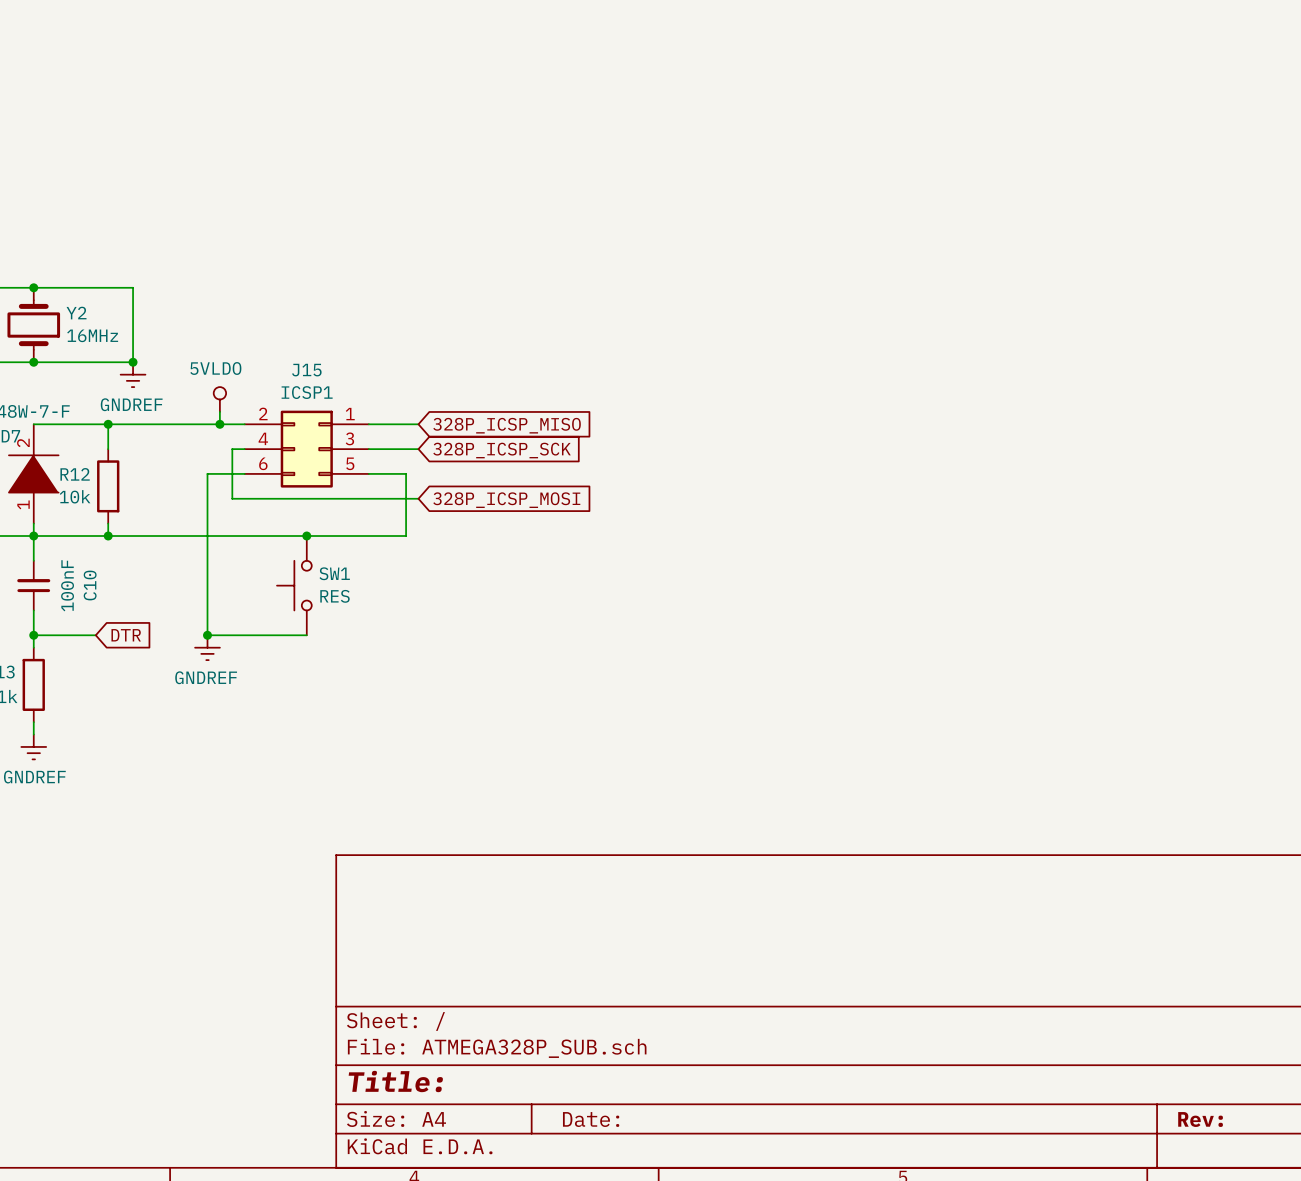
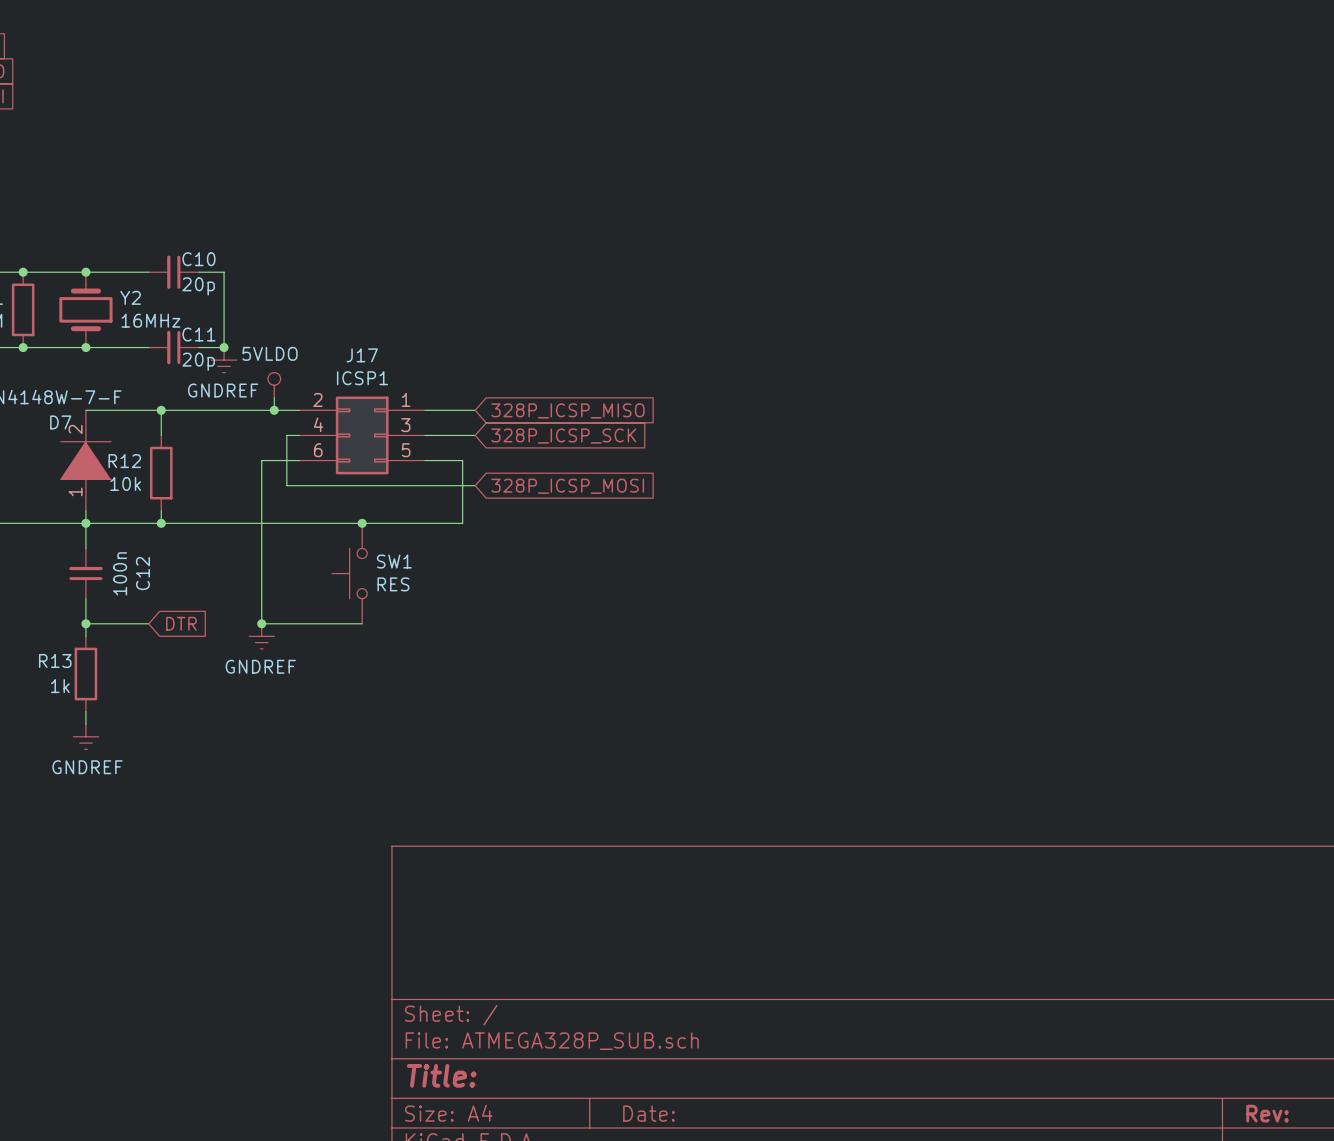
wire: (95, 287) (133, 287) (133, 362) (95, 362) -> none
C10: none -> 20p (173, 272)
wire: none -> (198, 272) (224, 272) (224, 347) (198, 347)
C11: none -> 20p (173, 347)
junction position: (133, 362) -> (224, 347)
J15 name: J15 (306, 370) -> J17 (362, 355)
power symbol position: GNDREF (133, 374) -> GNDREF (224, 360)
C10 value: 100nF (67, 585) -> 100n (120, 573)
C10 name: C10 (90, 585) -> C12 (142, 573)

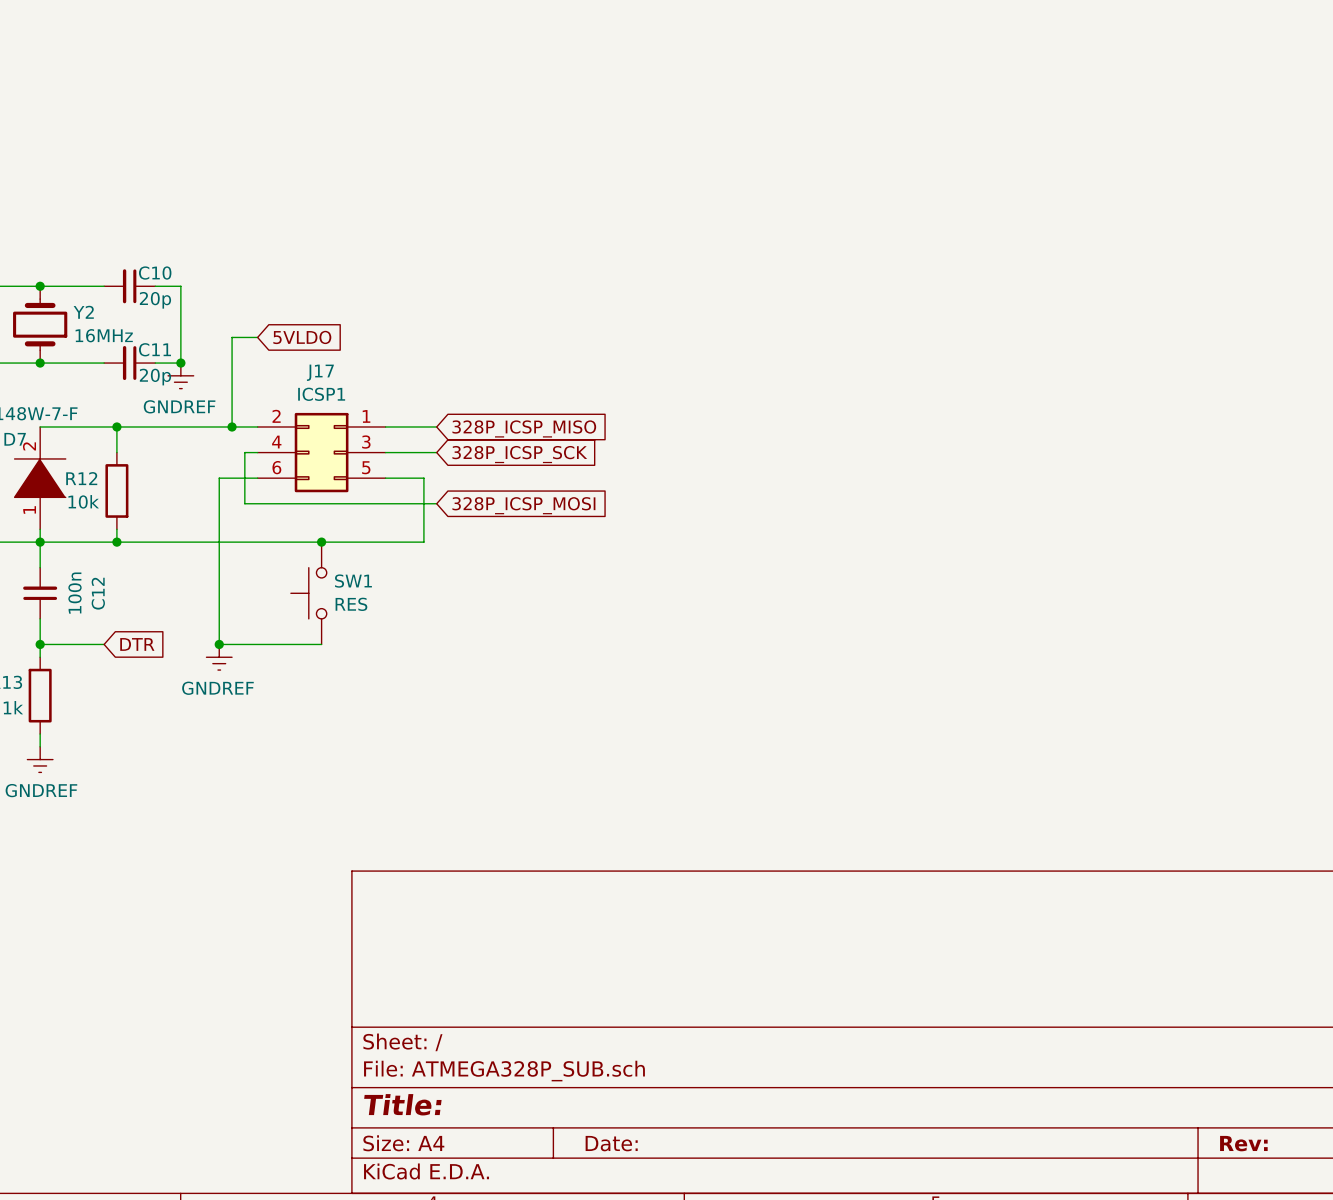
wire: none -> (257, 337) (232, 337) (232, 414)
global label: none -> 5VLDO (302, 337)
power symbol: 5VLDO (274, 385) -> none

